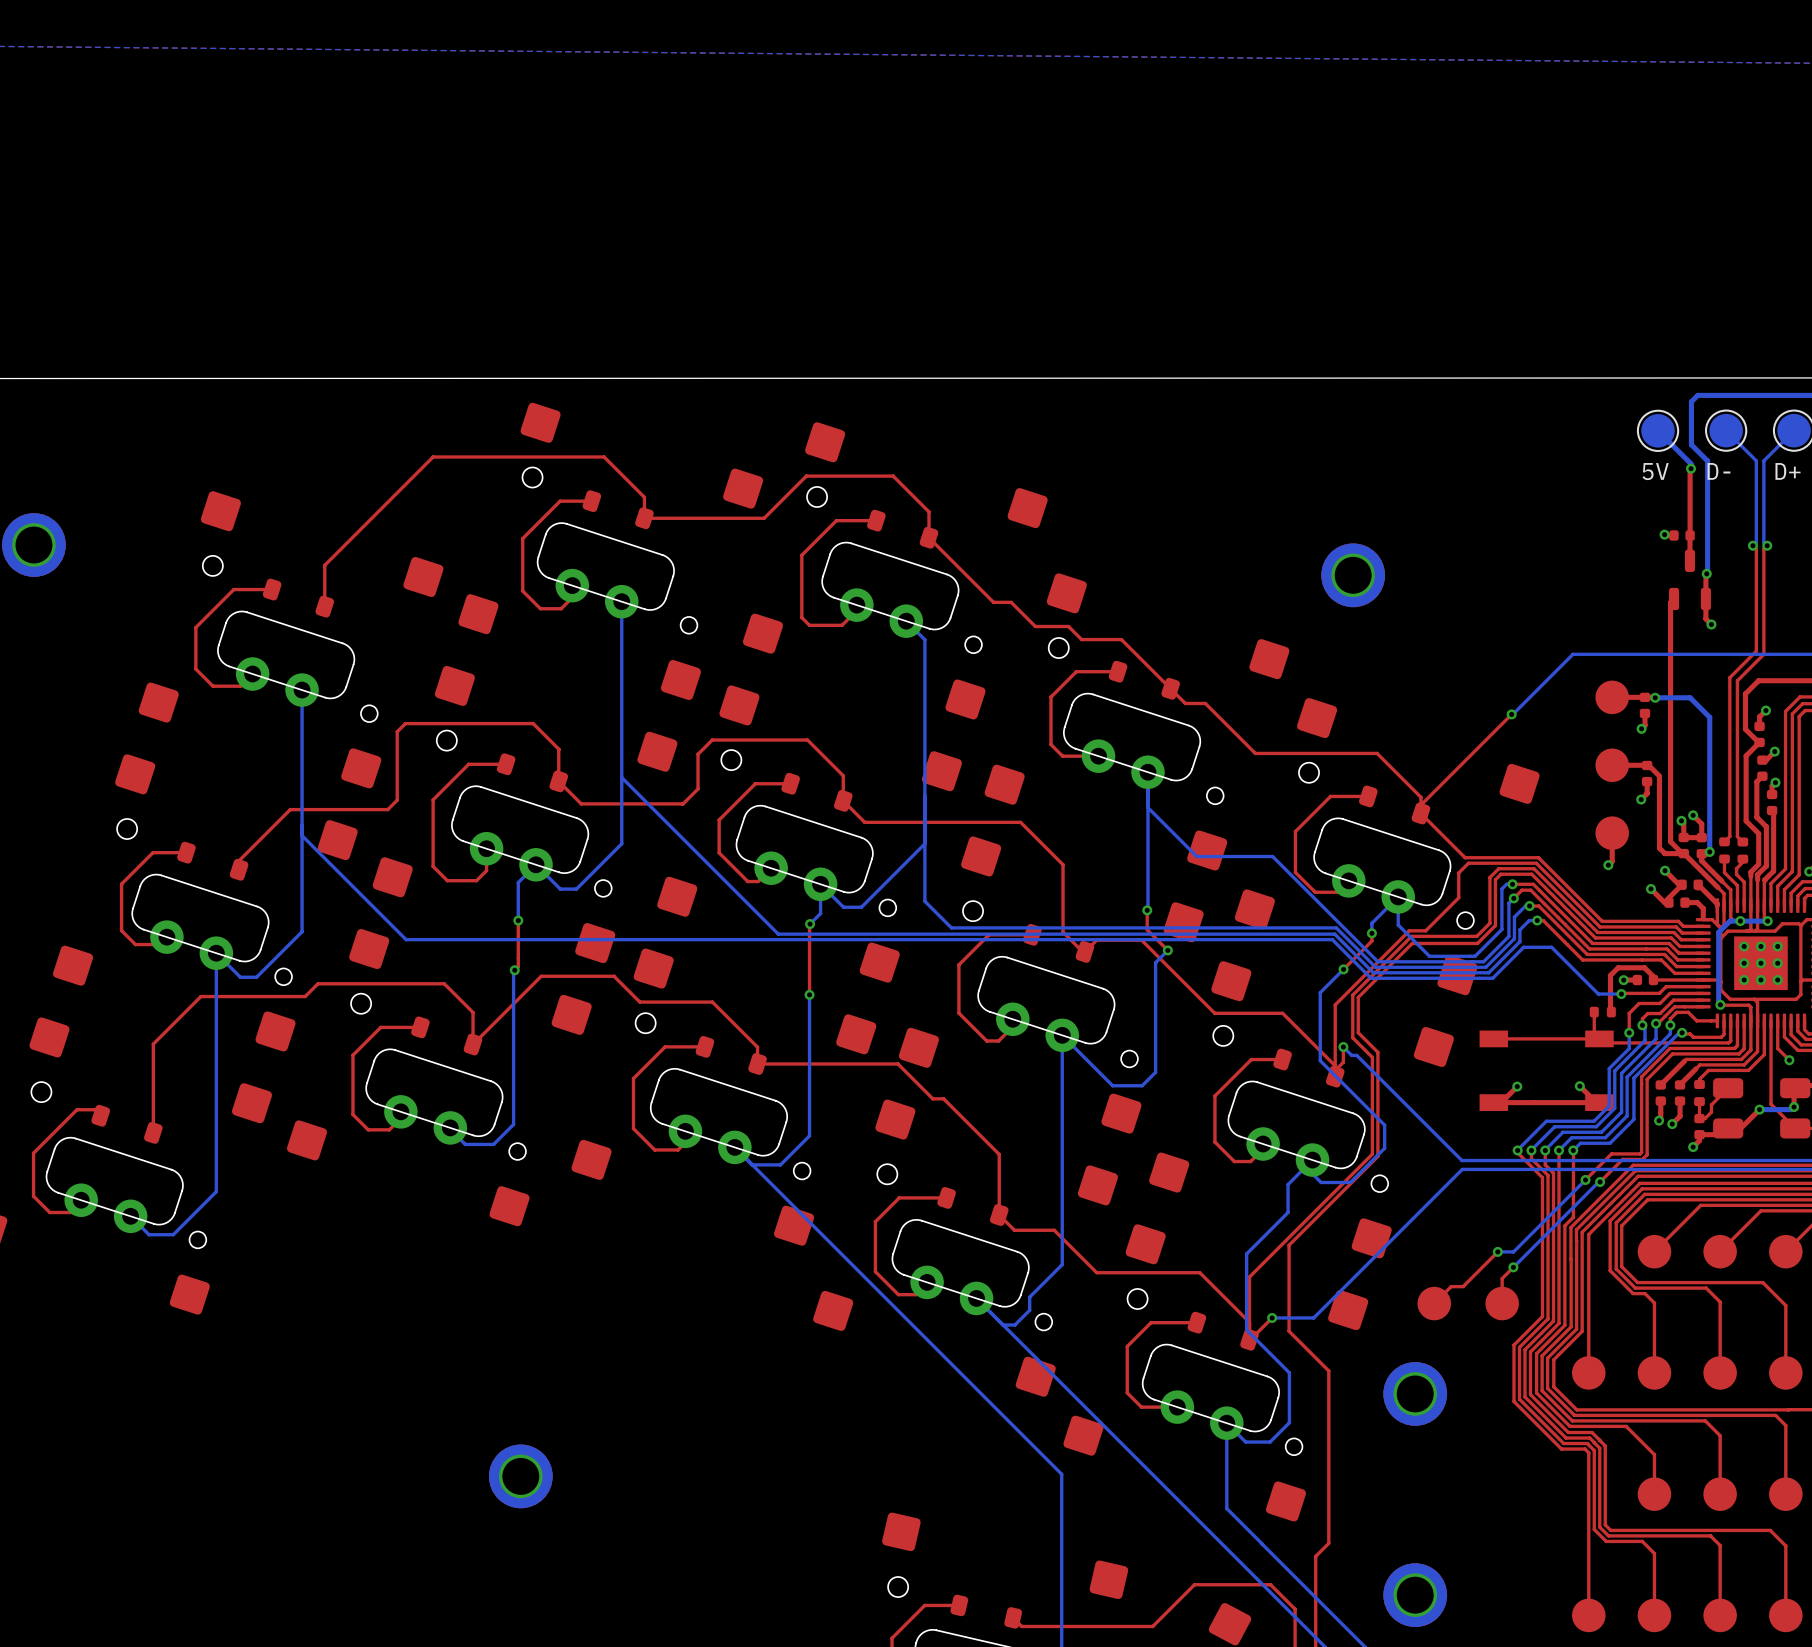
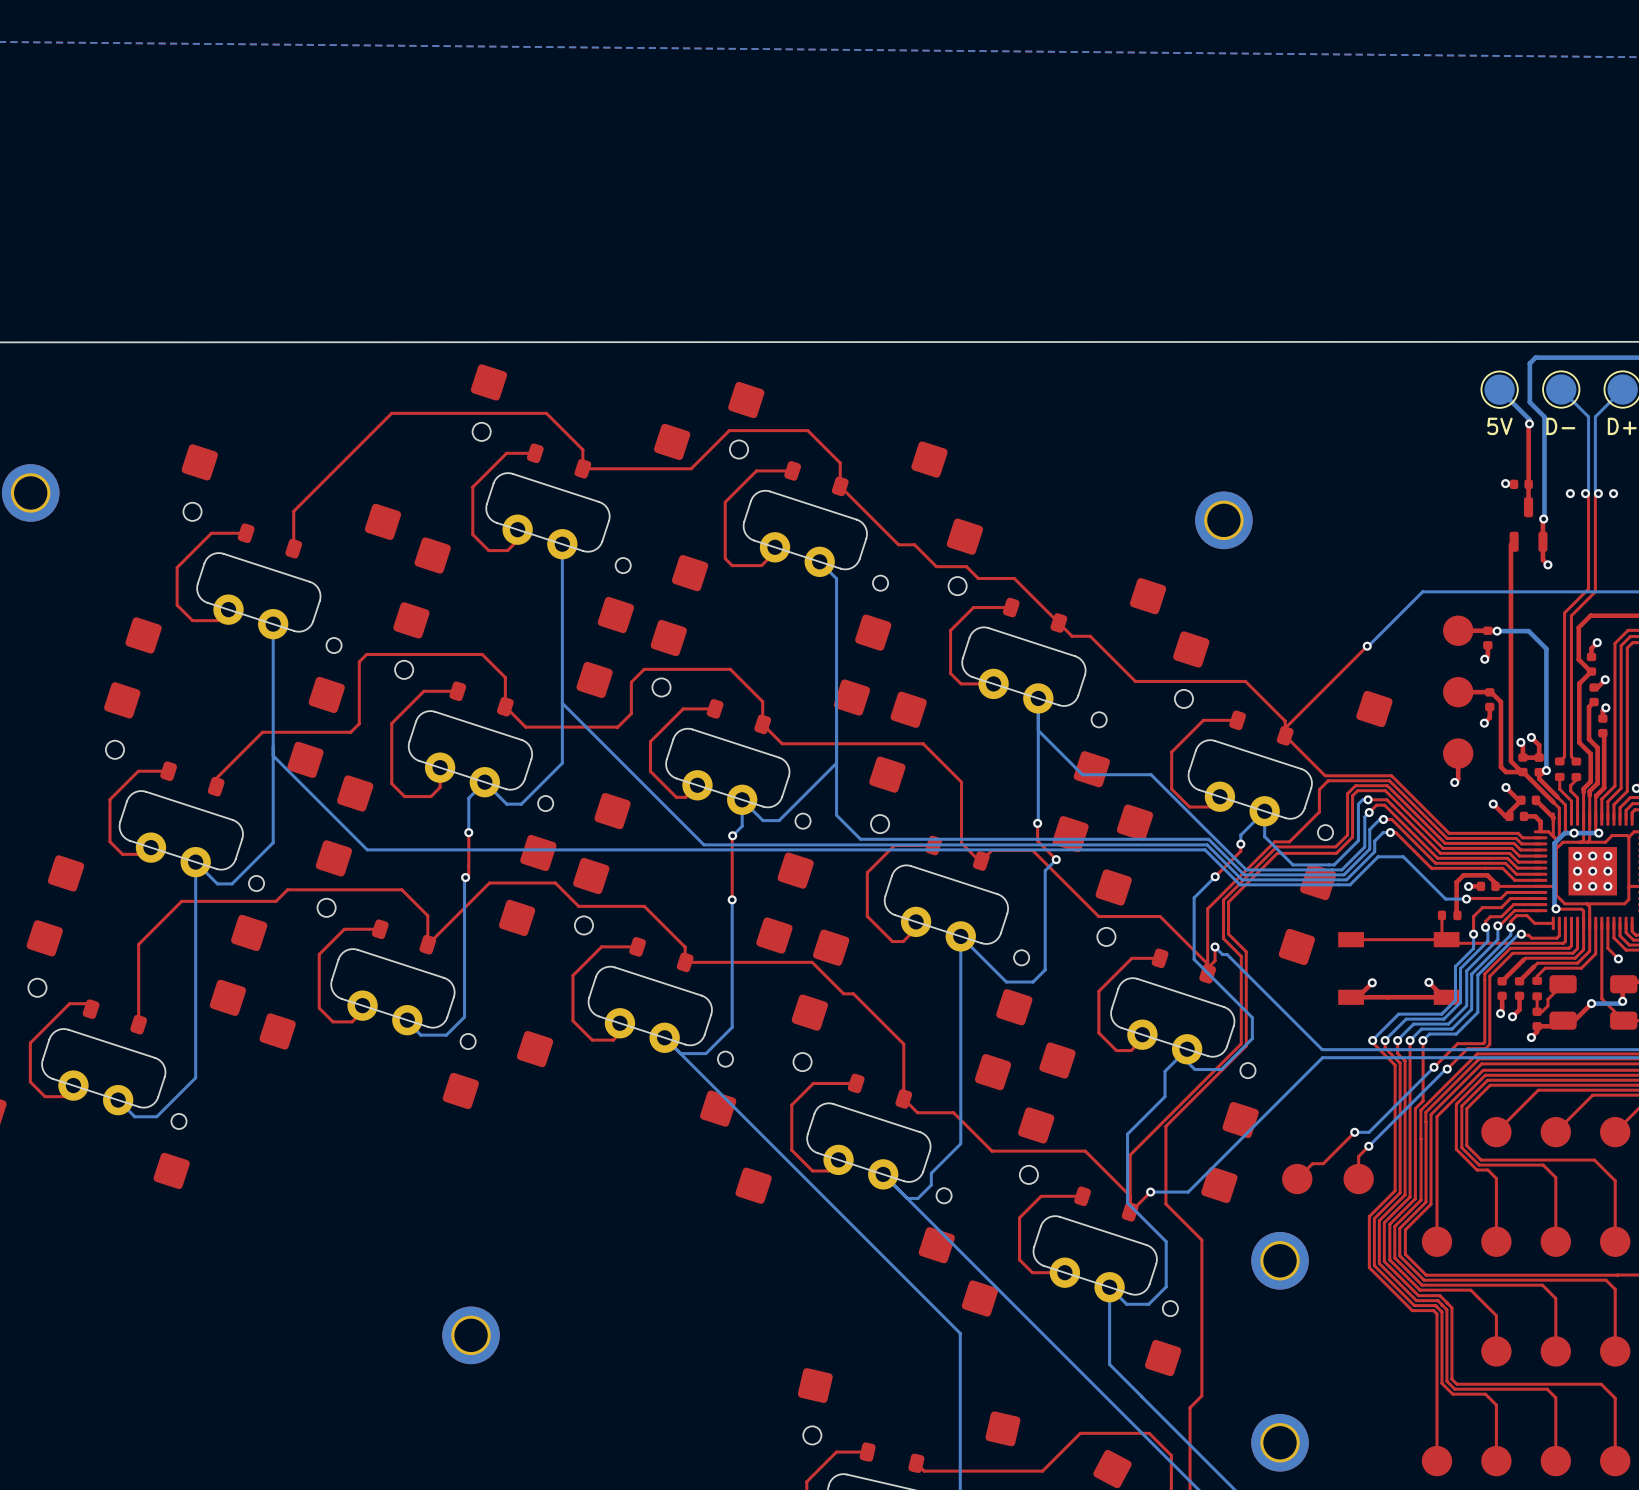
via: none -> (1570, 493)
via: none -> (1613, 493)

